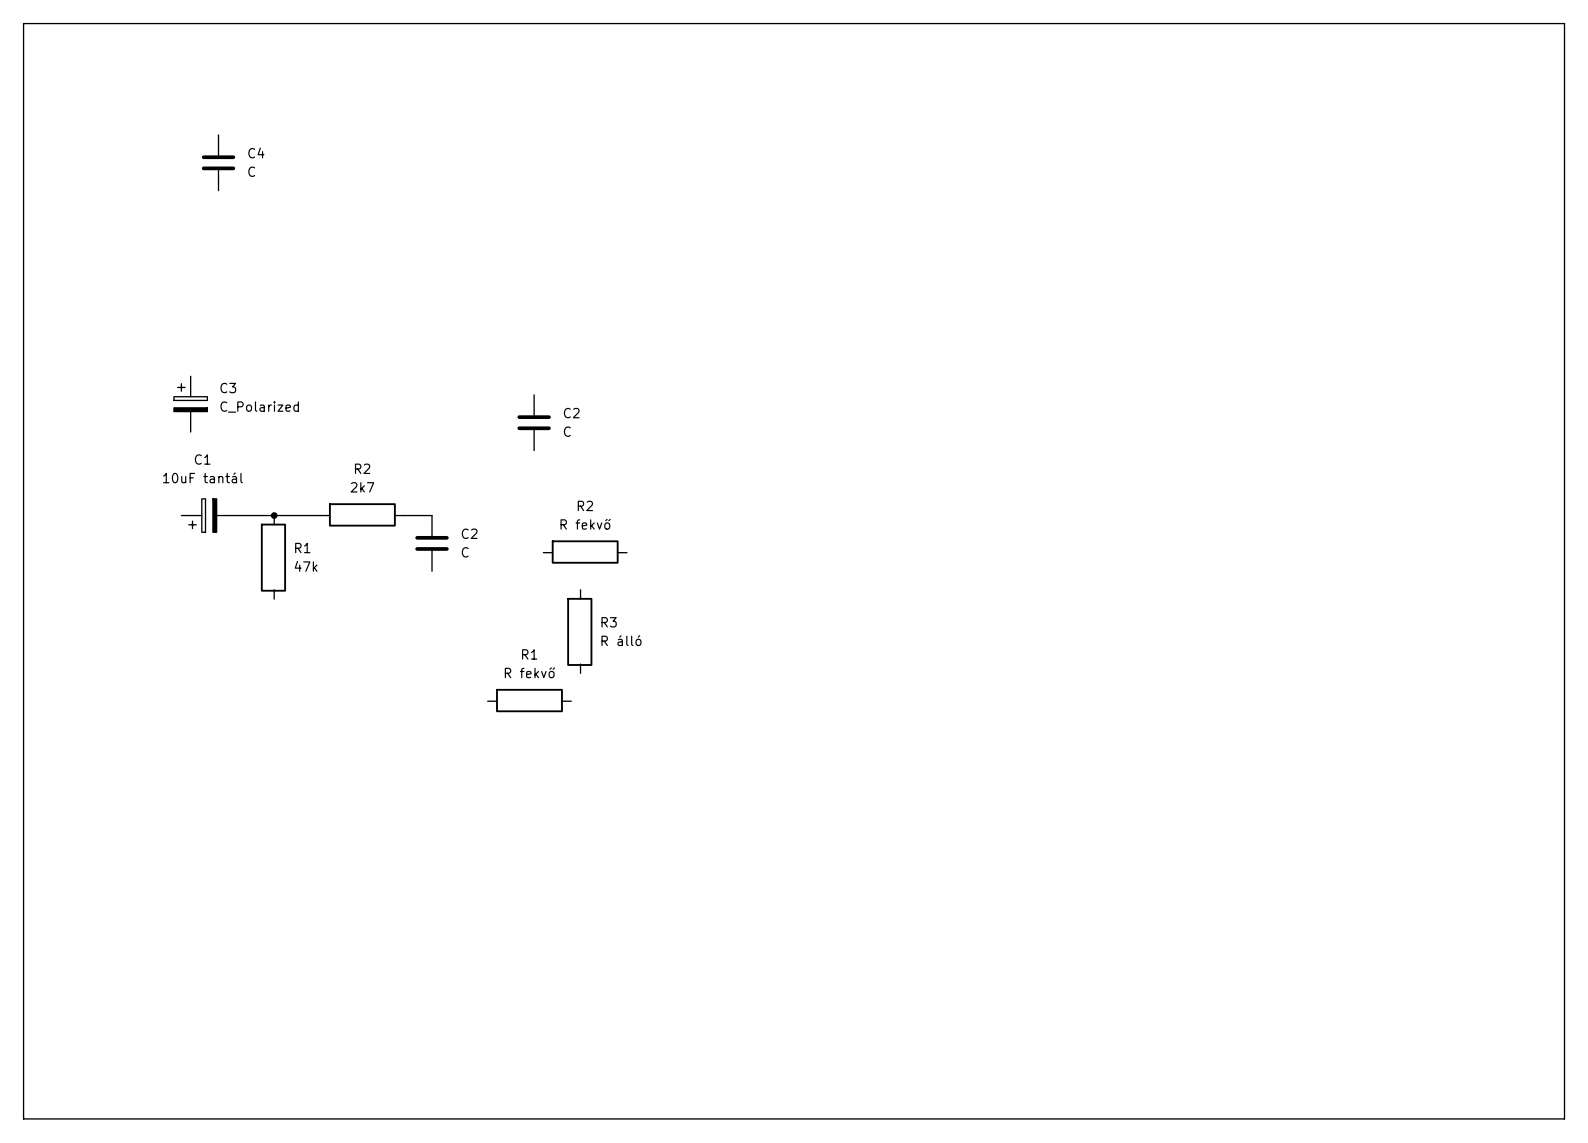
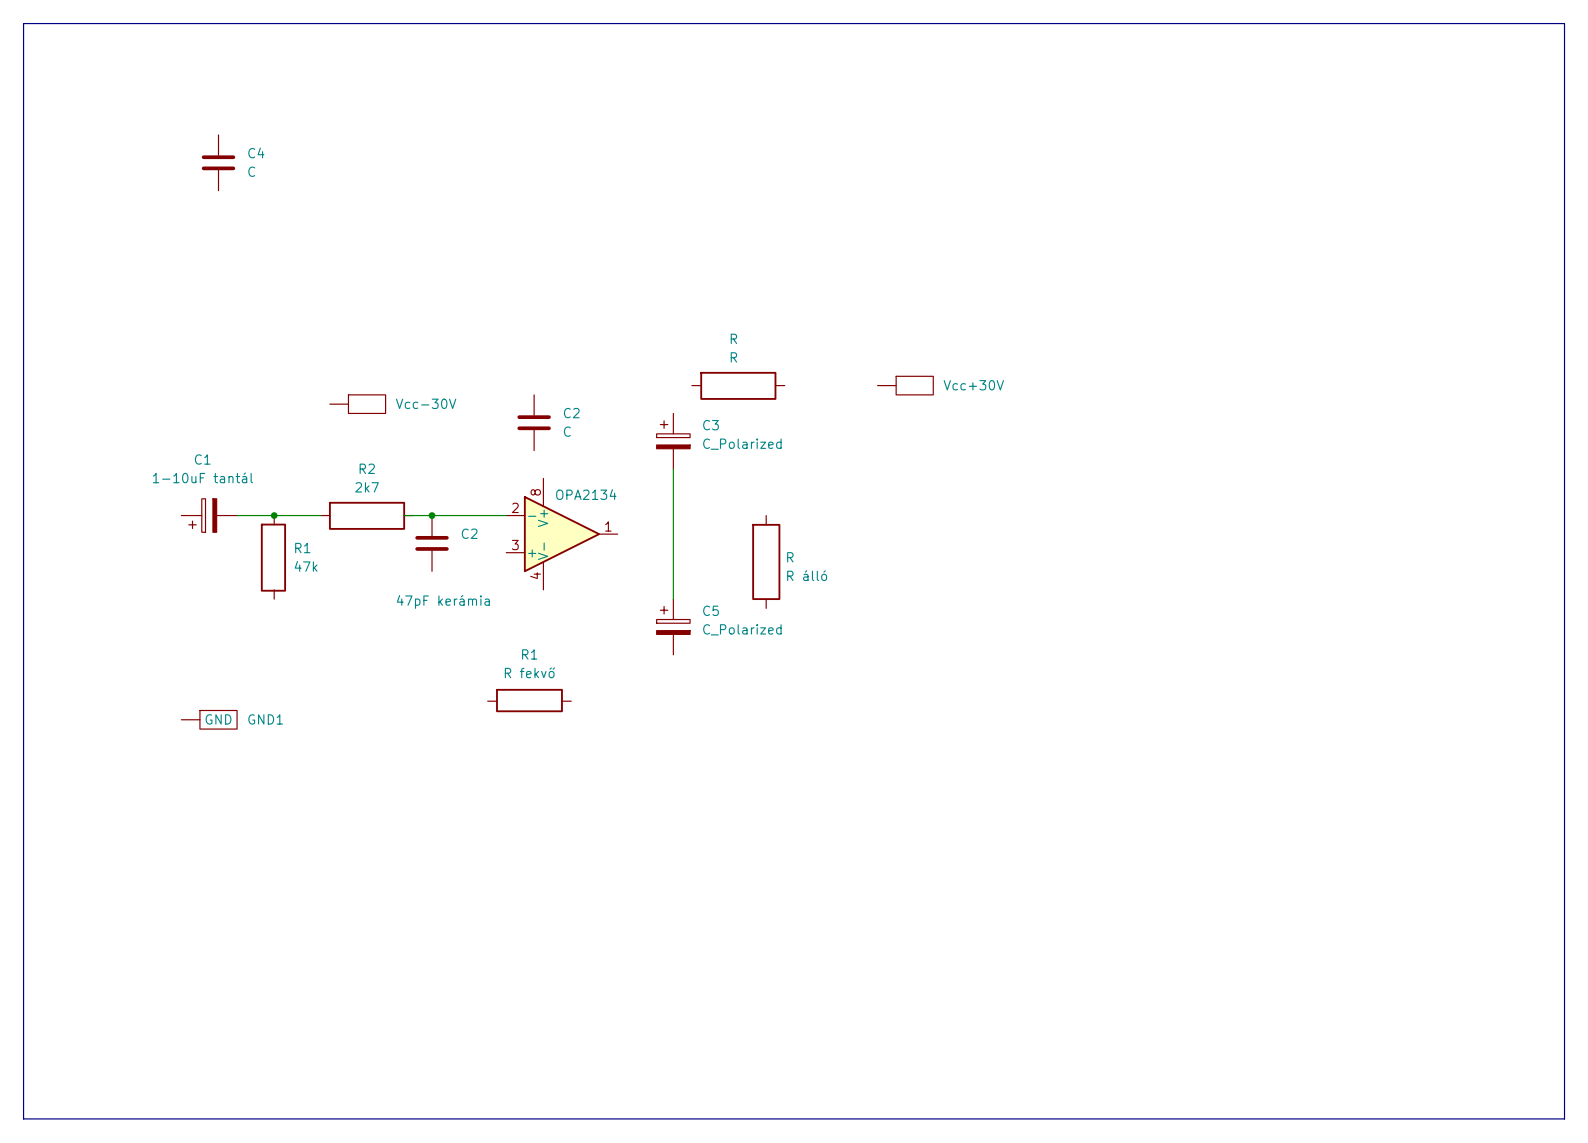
R: none -> R (738, 385)
Vcc+30V: none -> (905, 385)
C3 position: (190, 404) -> (673, 441)
Vcc-30V: none -> (357, 404)
wire: none -> (673, 469) (673, 599)
C1 value: 10uF tantál (202, 477) -> 1-10uF tantál (202, 477)
R2 symbol: [320, 503, 405, 527] -> [320, 501, 414, 530]
wire: none -> (432, 515) (506, 515)
junction: none -> (432, 515)
part: none -> (543, 534)
part: none -> OPA2134 (561, 534)
C2 value: C (465, 552) -> 47pF kerámia (443, 601)
R2: R fekvő (585, 552) -> none
R: none -> R álló (766, 561)
C5: none -> C_Polarized (673, 626)
R3: R álló (579, 631) -> none
GND1: none -> (209, 719)

